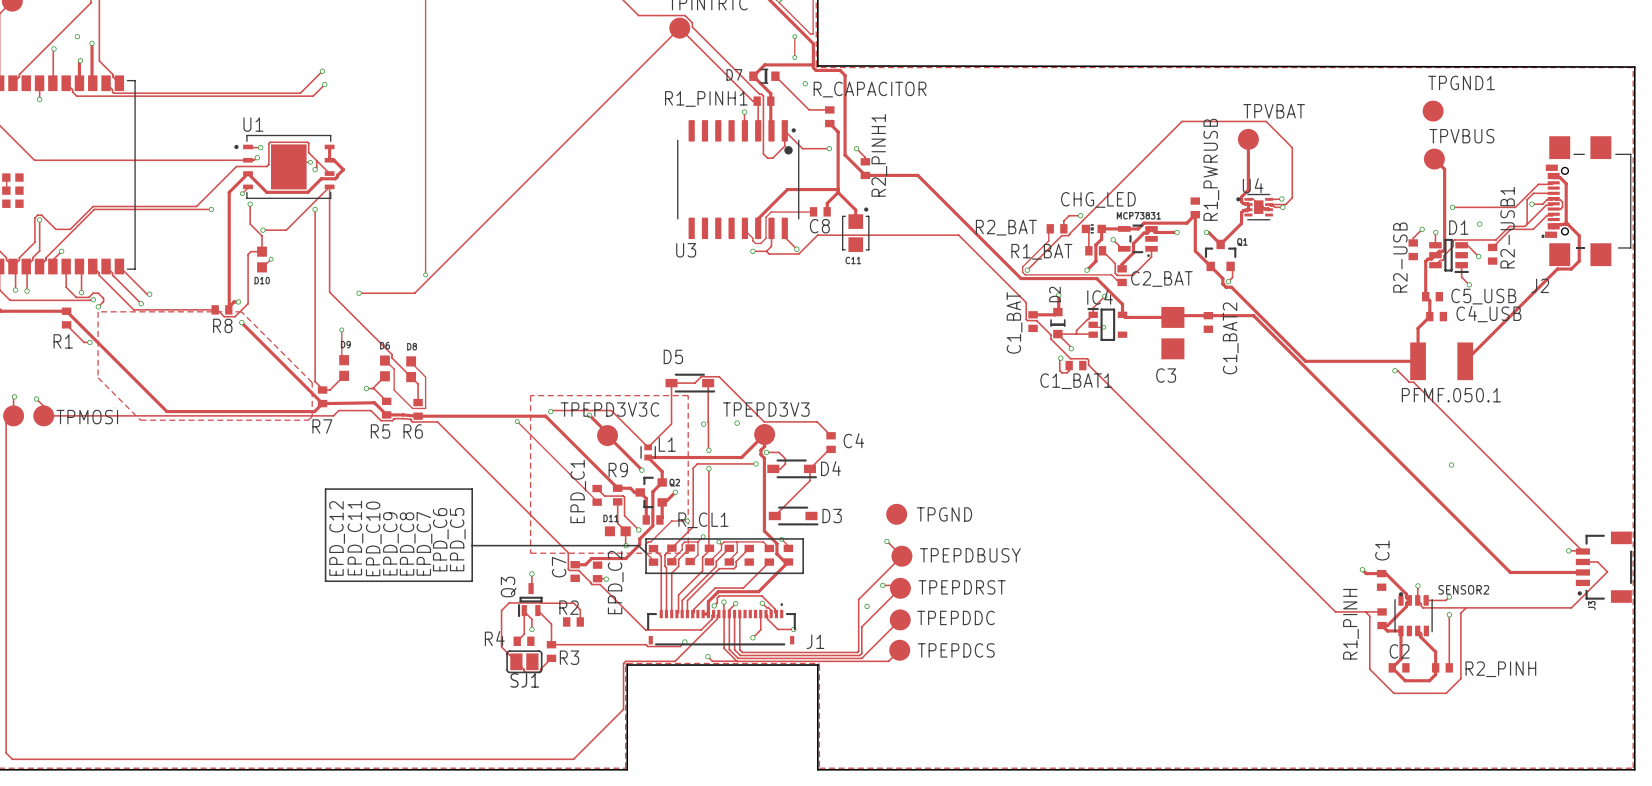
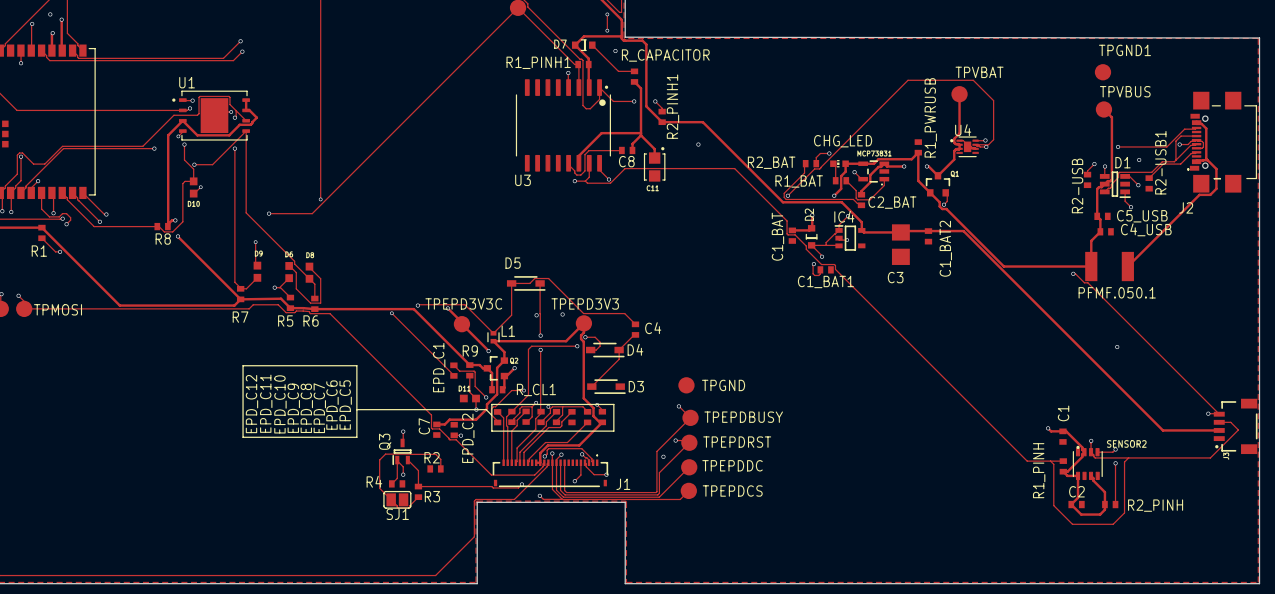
via: none -> (698, 144)
zone outline: (98, 311) (241, 311) (312, 382) (312, 416) (308, 420) (140, 420) (98, 377) (98, 311) -> none
zone outline: (530, 395) (688, 395) (688, 553) (530, 553) (530, 395) -> none

